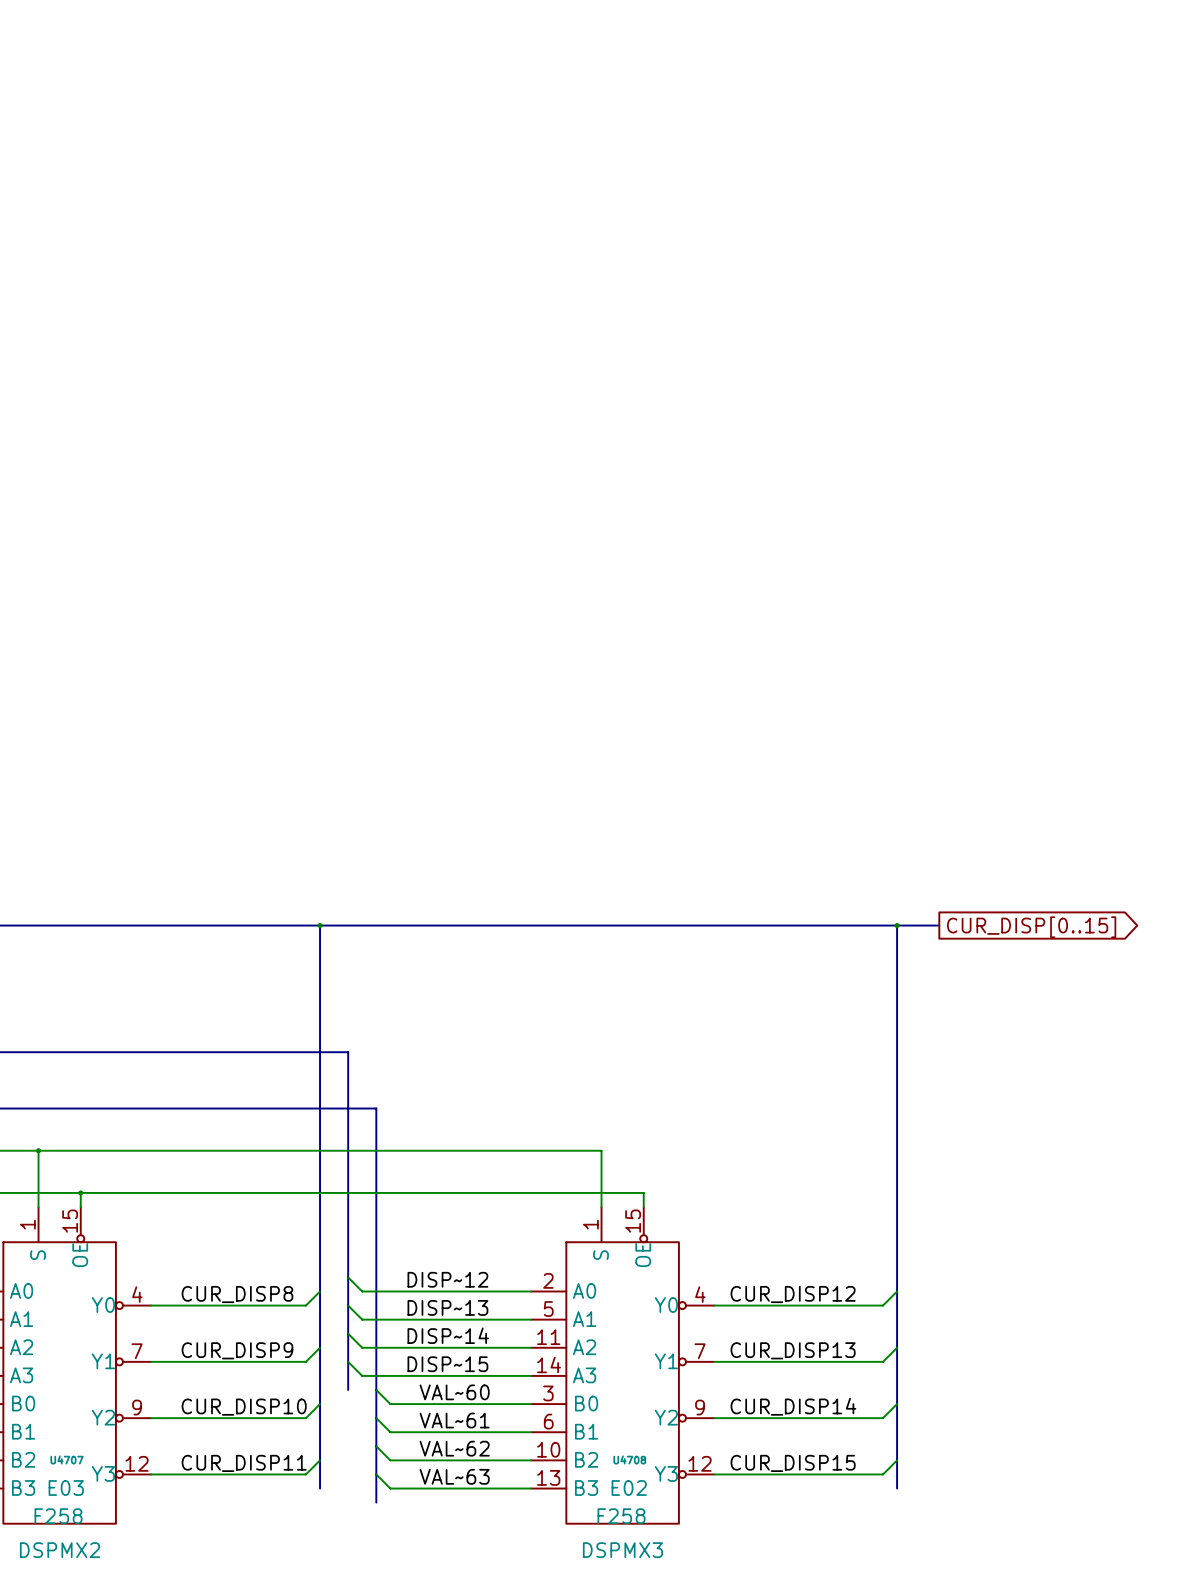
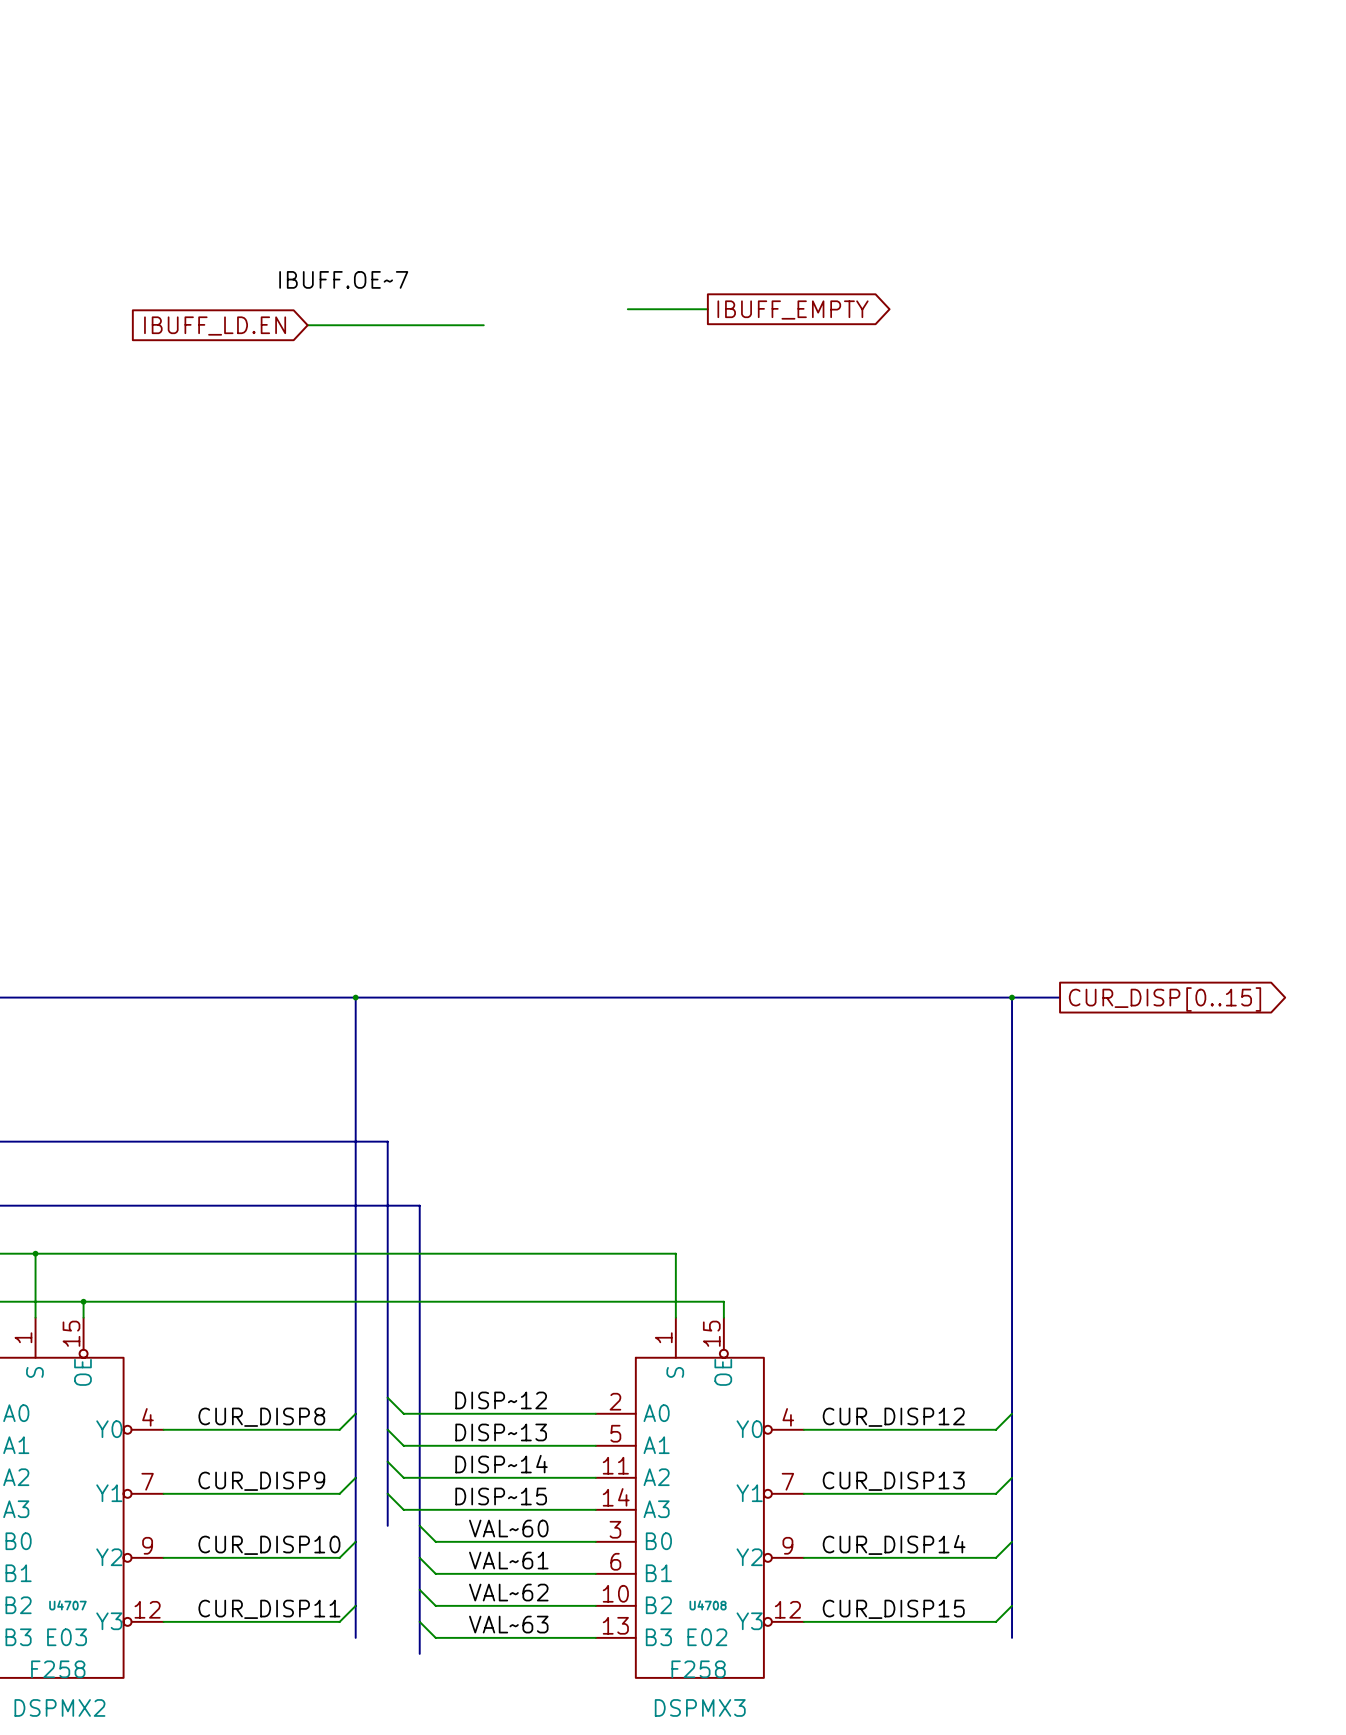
label: none -> IBUFF.OE~7 (343, 279)
wire: none -> (627, 309) (707, 309)
global label: none -> IBUFF_EMPTY (793, 310)
wire: none -> (307, 325) (483, 325)
global label: none -> IBUFF_LD.EN (215, 326)

